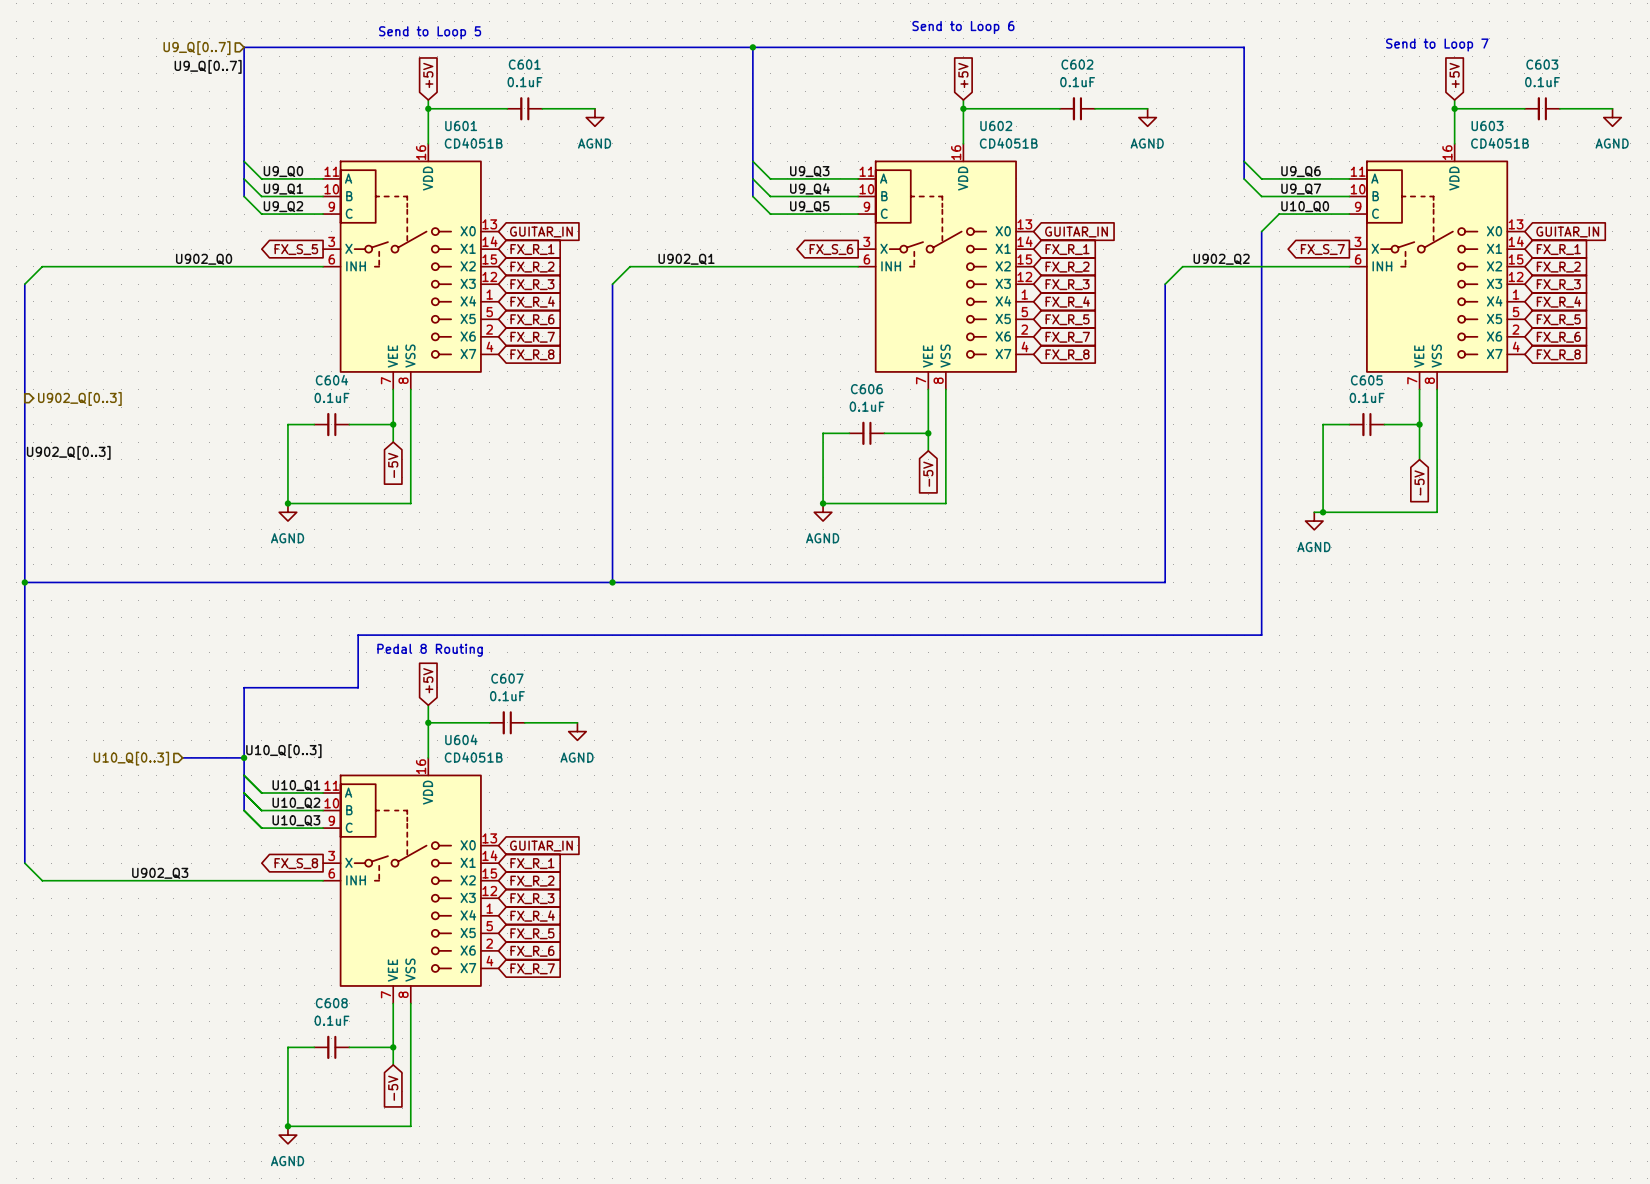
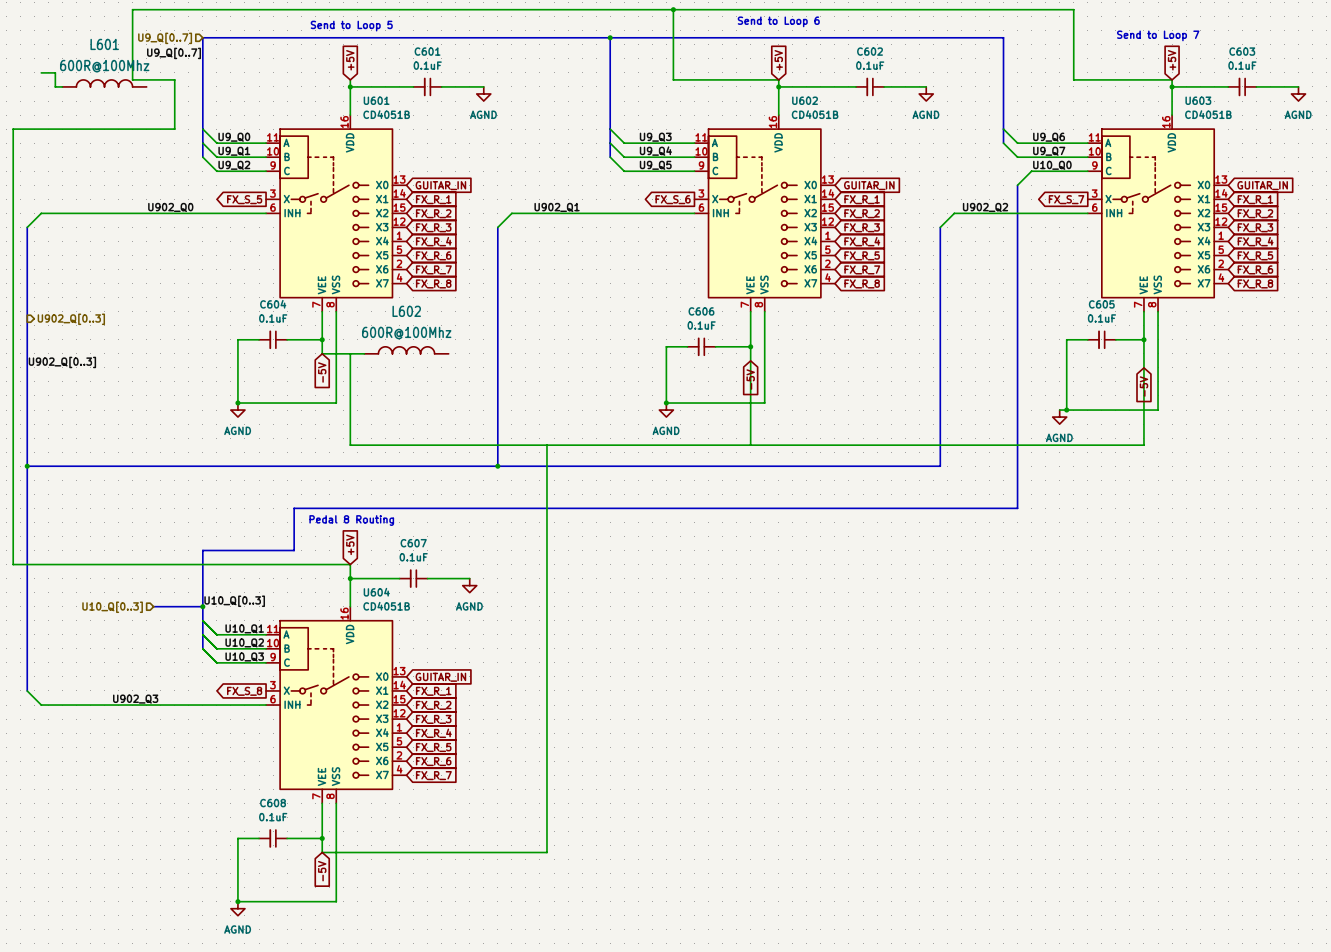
wire: none -> (673, 9) (673, 79) (778, 79)
junction: none -> (673, 9)
wire: none -> (41, 72) (55, 72) (55, 86) (62, 86)
wire: none -> (1172, 79) (1073, 79) (1073, 9) (132, 9) (132, 79) (174, 79) (174, 129) (13, 129) (13, 564) (350, 564)
L601: none -> 600R@100Mhz (104, 83)
L602: none -> 600R@100Mhz (406, 350)
wire: none -> (322, 353) (364, 353)
wire: none -> (350, 353) (350, 445) (1143, 445) (1143, 367)
wire: none -> (750, 360) (750, 445)
wire: none -> (546, 445) (546, 852) (322, 852)

